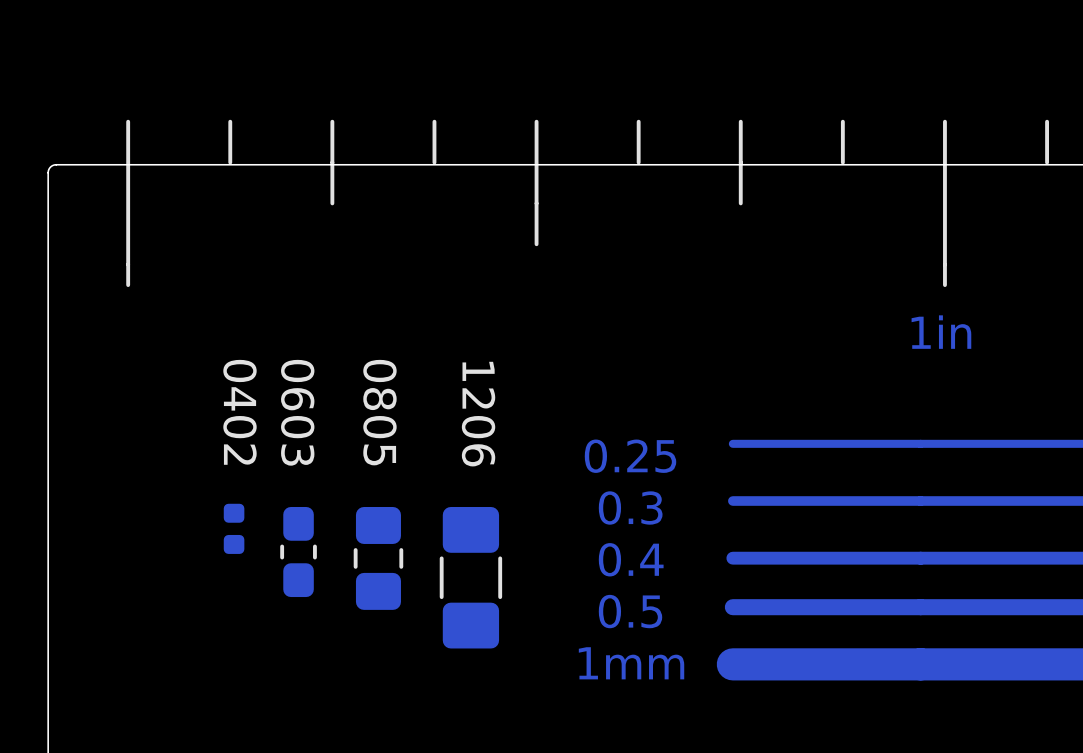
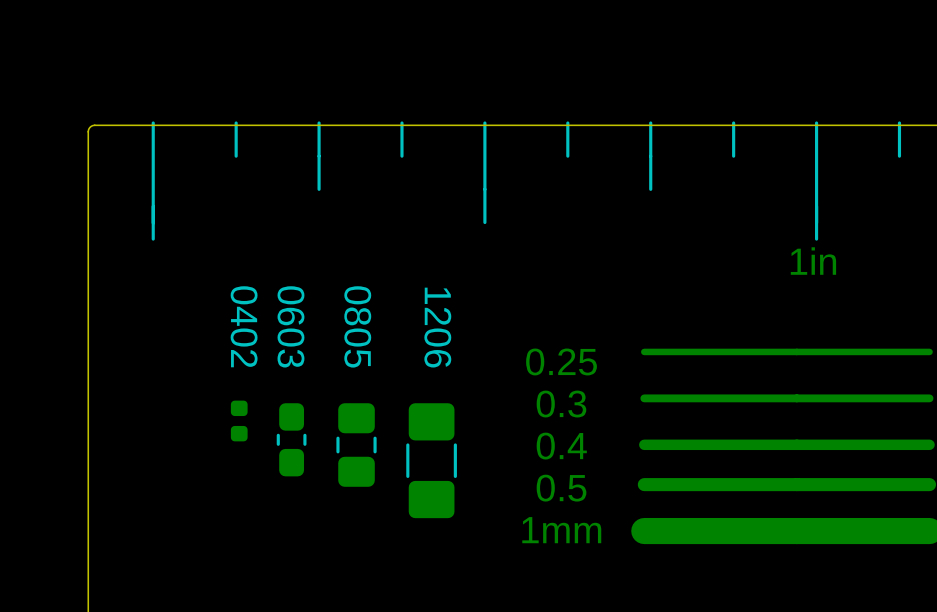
line: (128, 121) (128, 161) -> none
line: (230, 121) (230, 161) -> (236, 156) (236, 123)
line: (332, 121) (332, 161) -> (319, 156) (319, 189)
line: (434, 121) (434, 161) -> (401, 156) (401, 123)
line: (536, 121) (536, 161) -> (484, 189) (484, 222)
line: (638, 121) (638, 161) -> (567, 156) (567, 123)
line: (740, 121) (740, 161) -> (650, 156) (650, 189)
line: (842, 121) (842, 161) -> (733, 156) (733, 123)
line: (944, 121) (944, 161) -> none
line: (1047, 121) (1047, 161) -> (899, 156) (899, 123)
line: none -> (153, 223) (153, 239)
line: none -> (816, 223) (816, 239)

